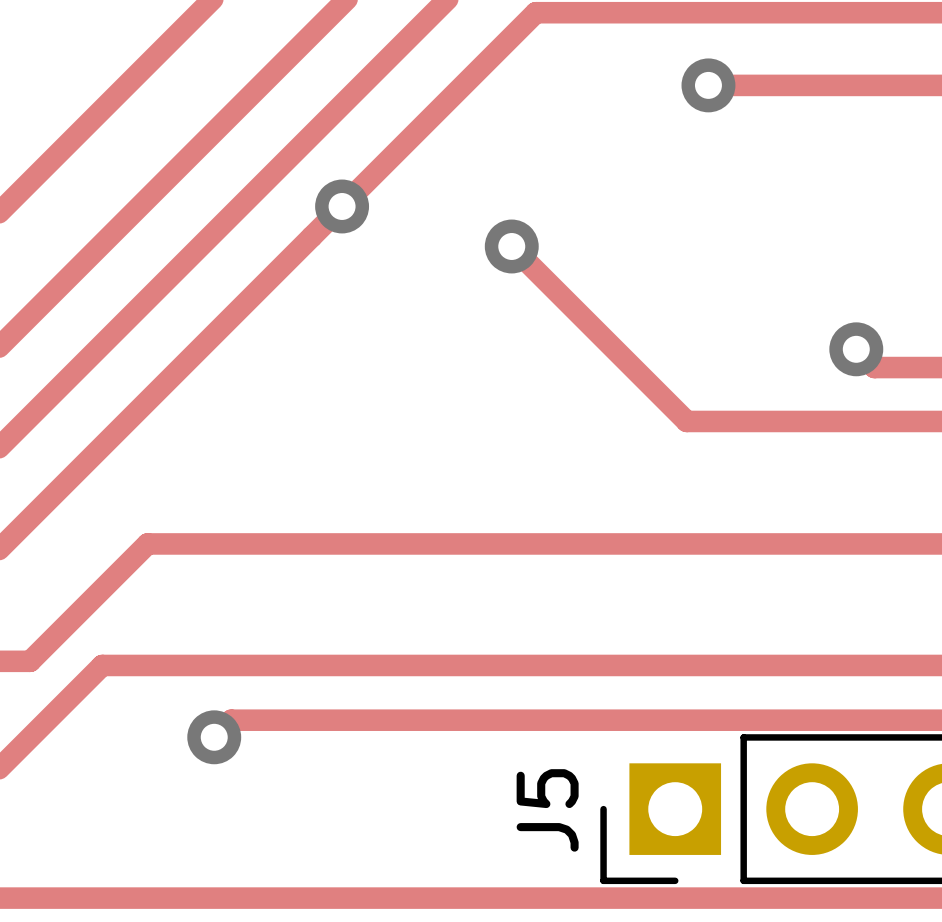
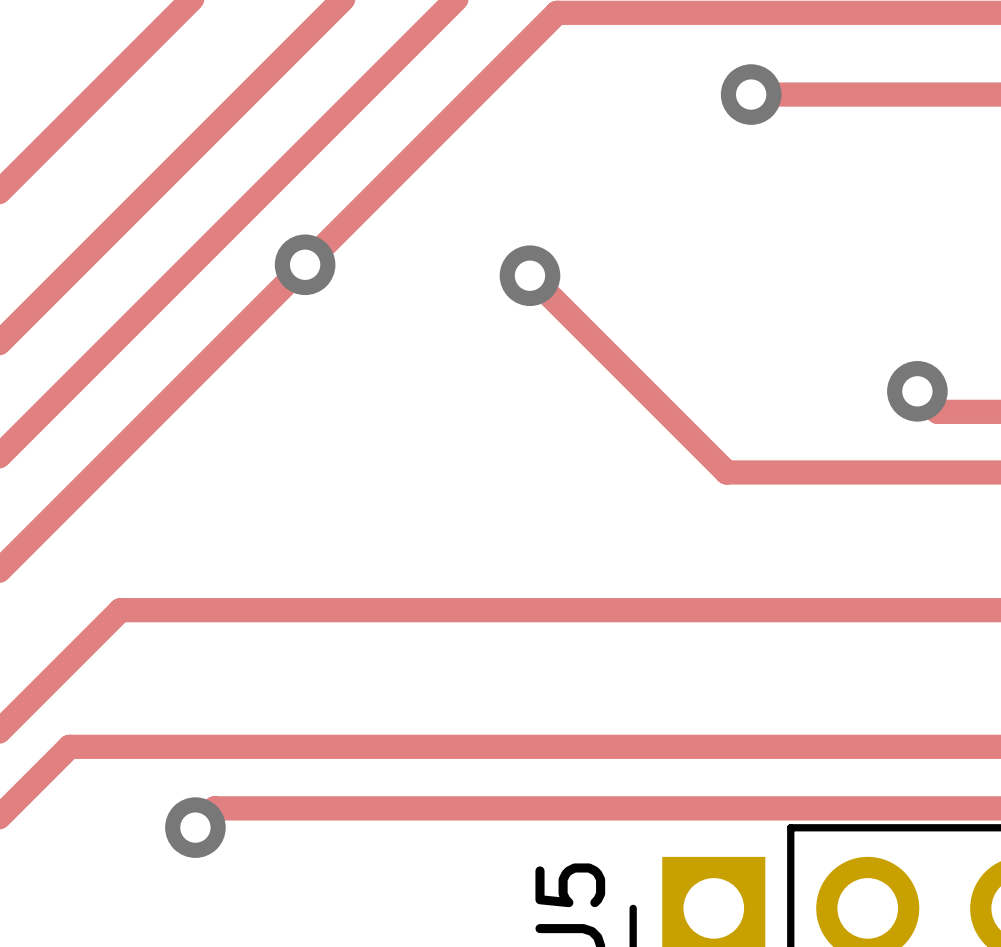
via position: (342, 206) -> (305, 264)

